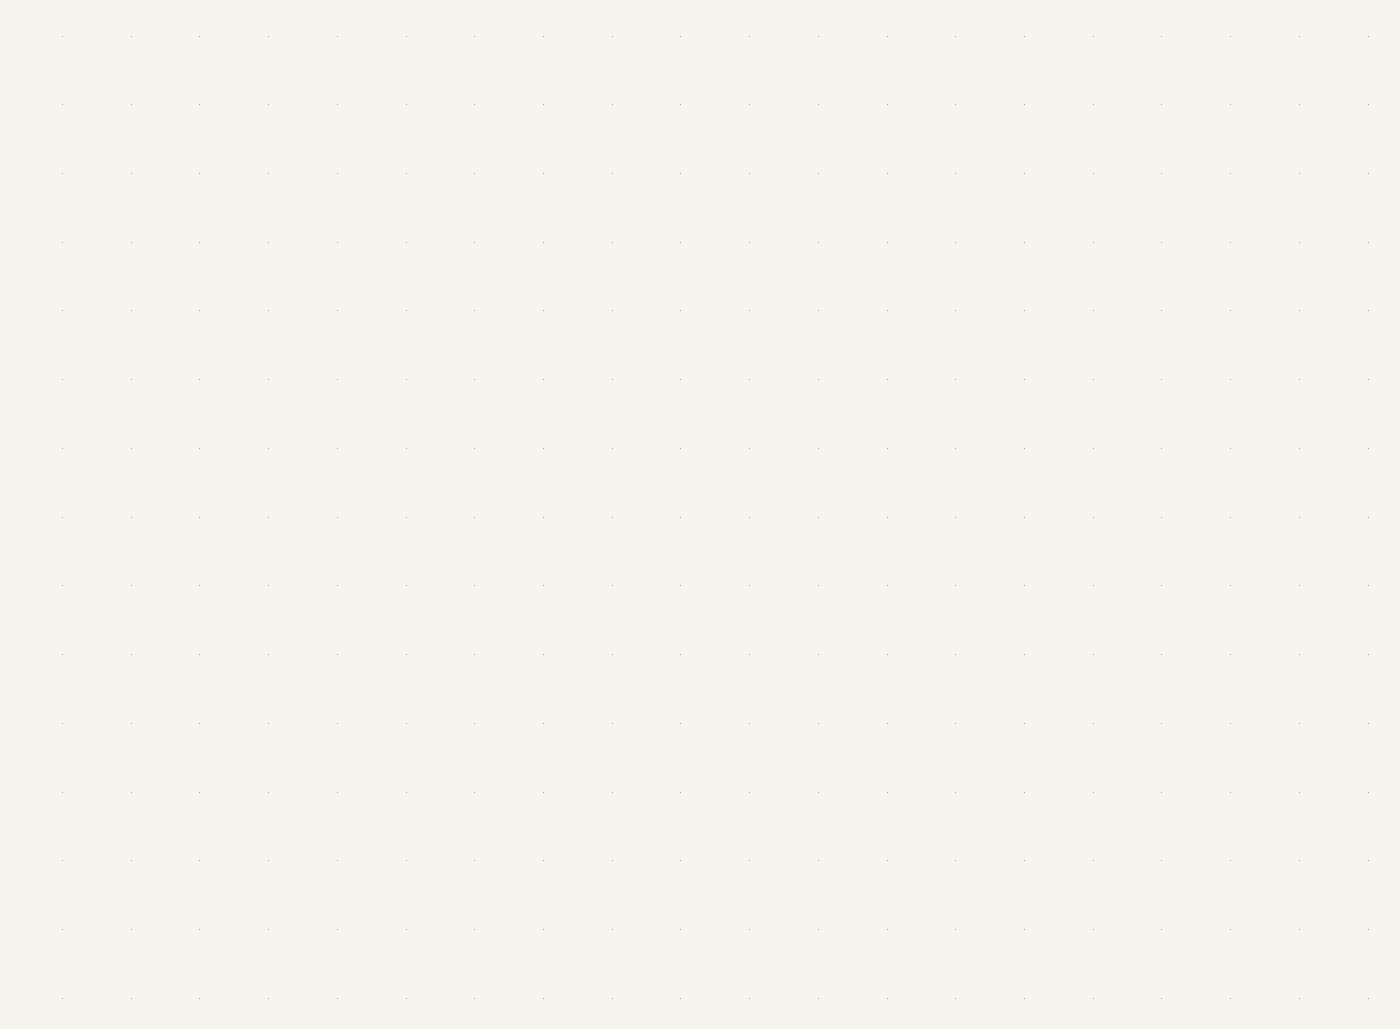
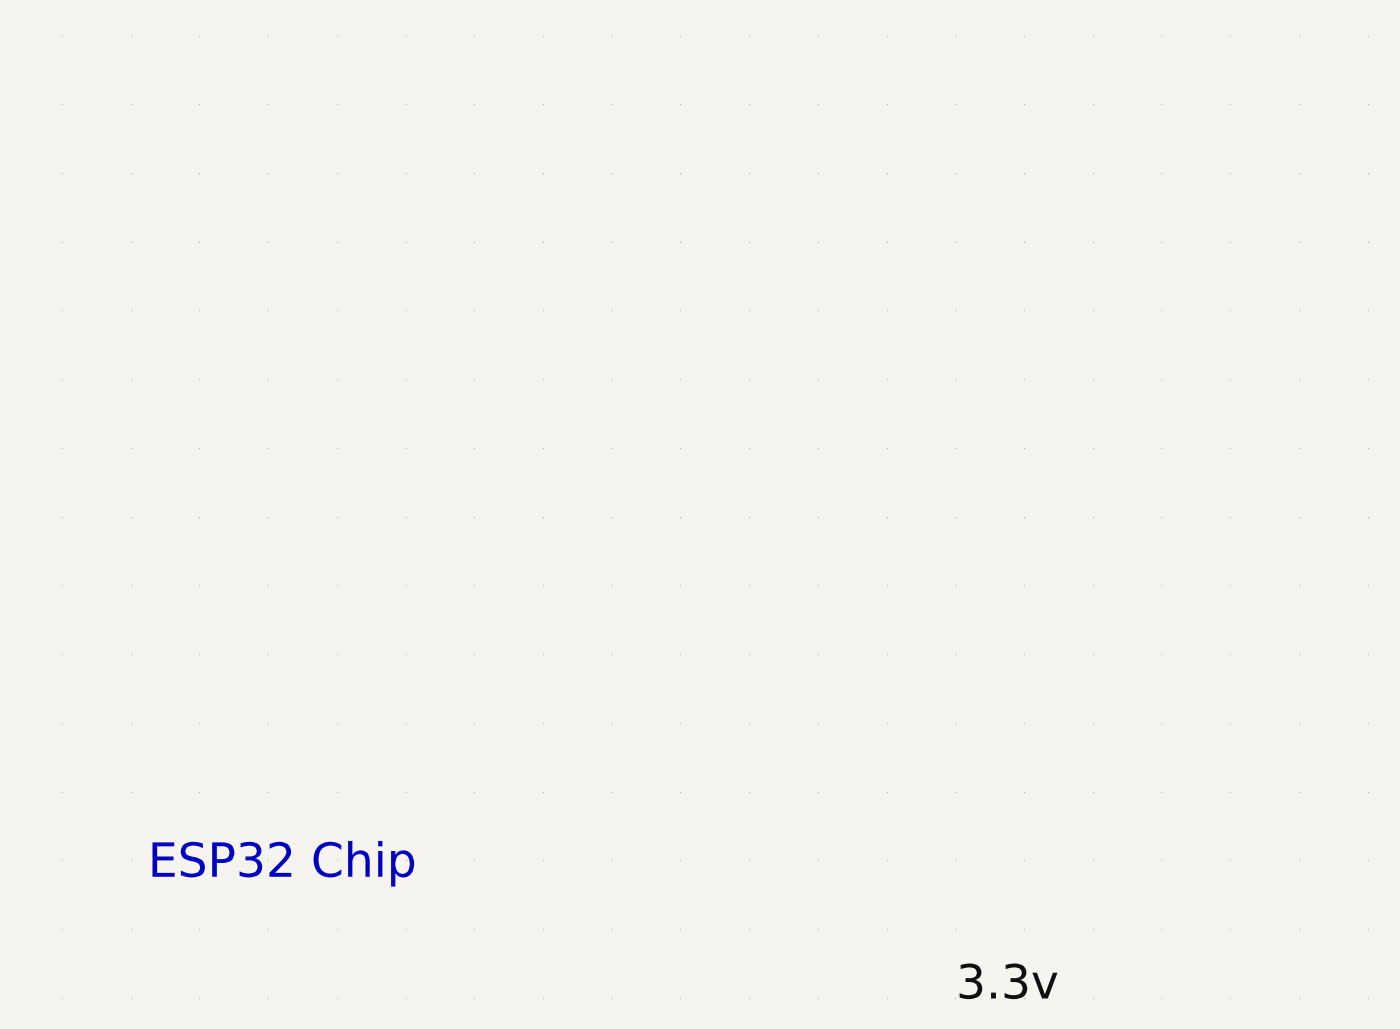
text: none -> ESP32 Chip (283, 863)
label: none -> 3.3v (1008, 981)

